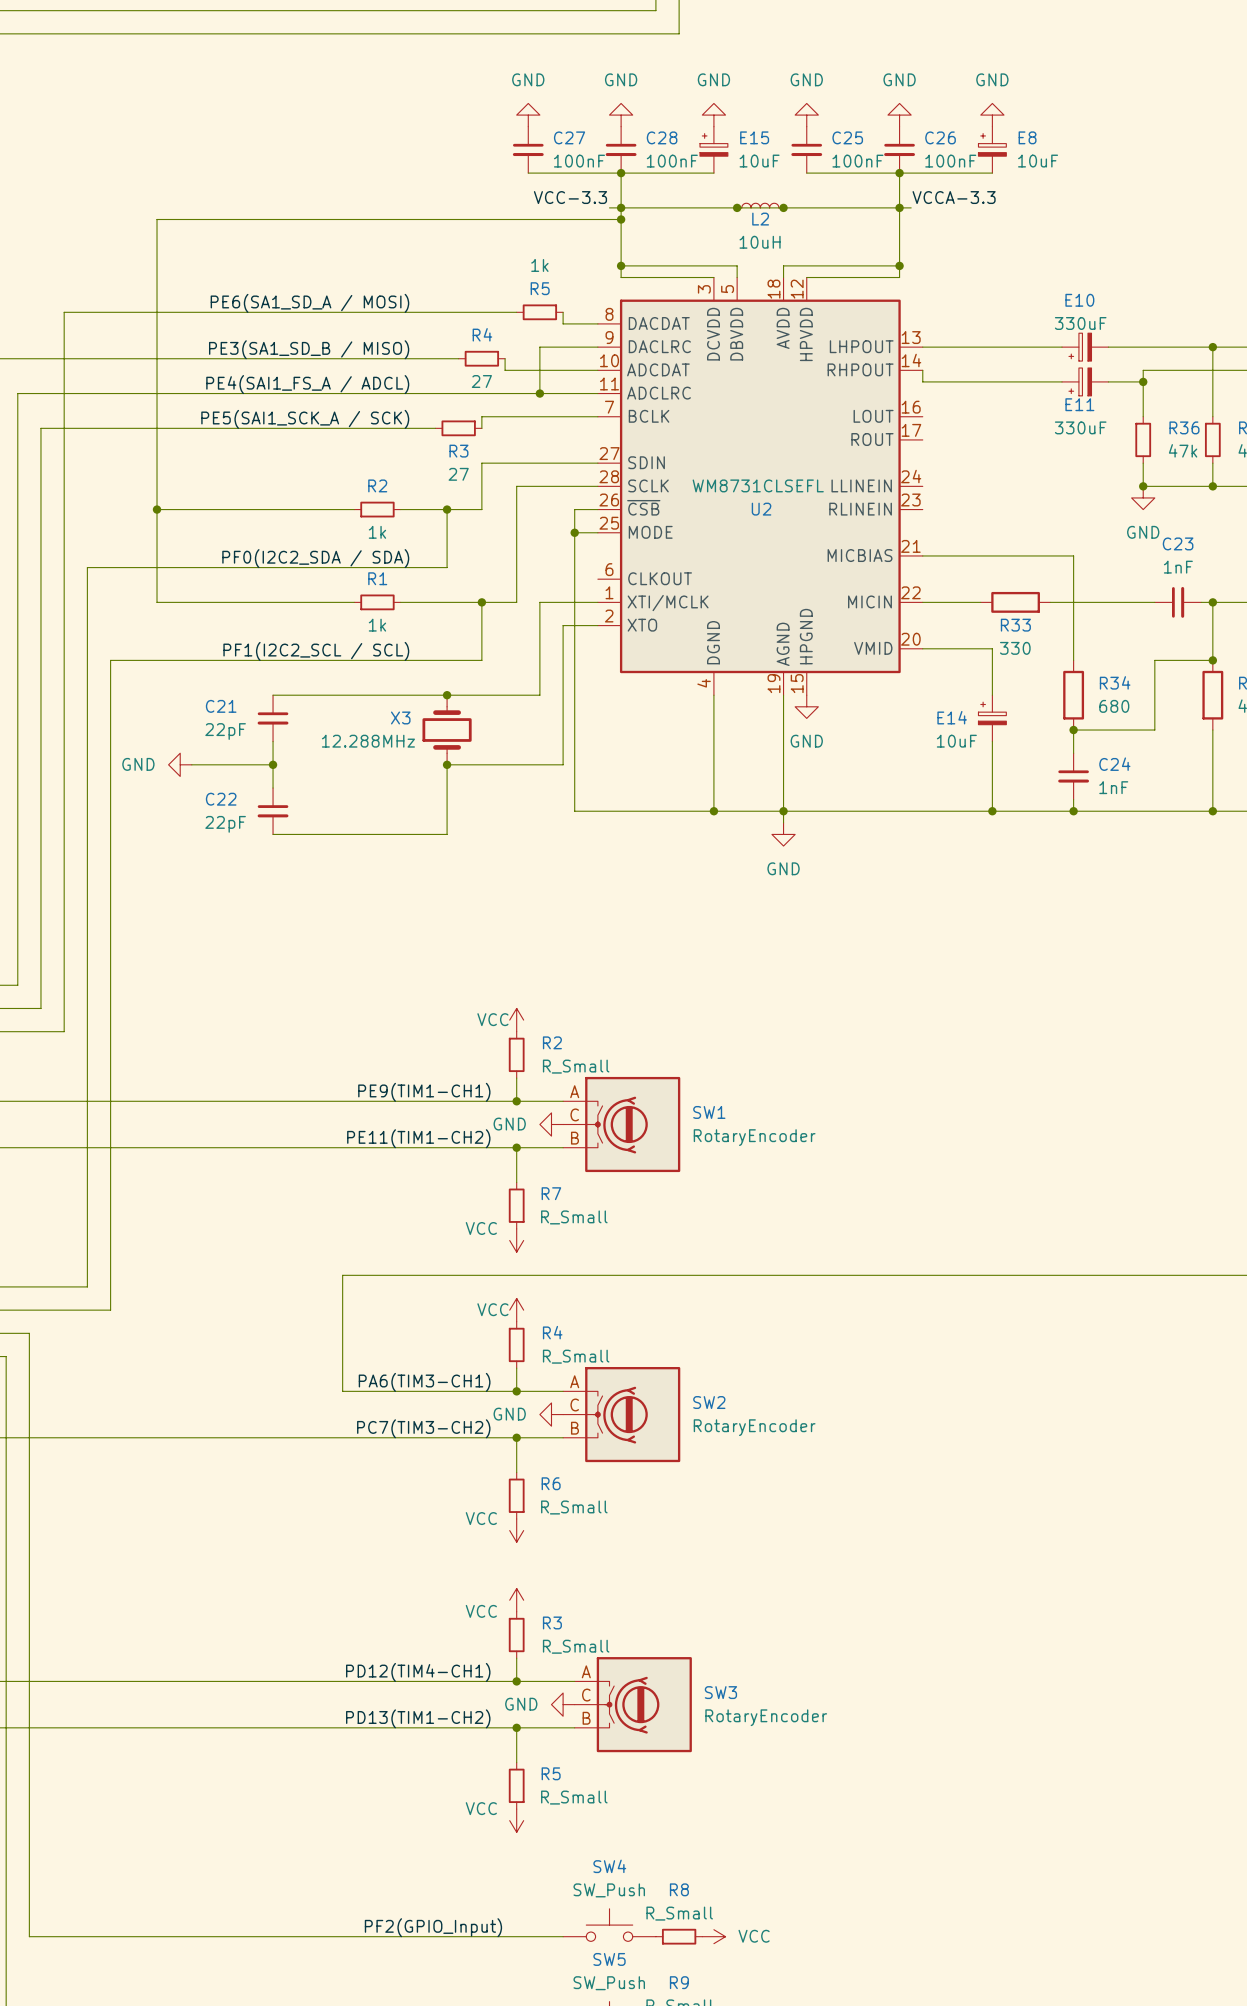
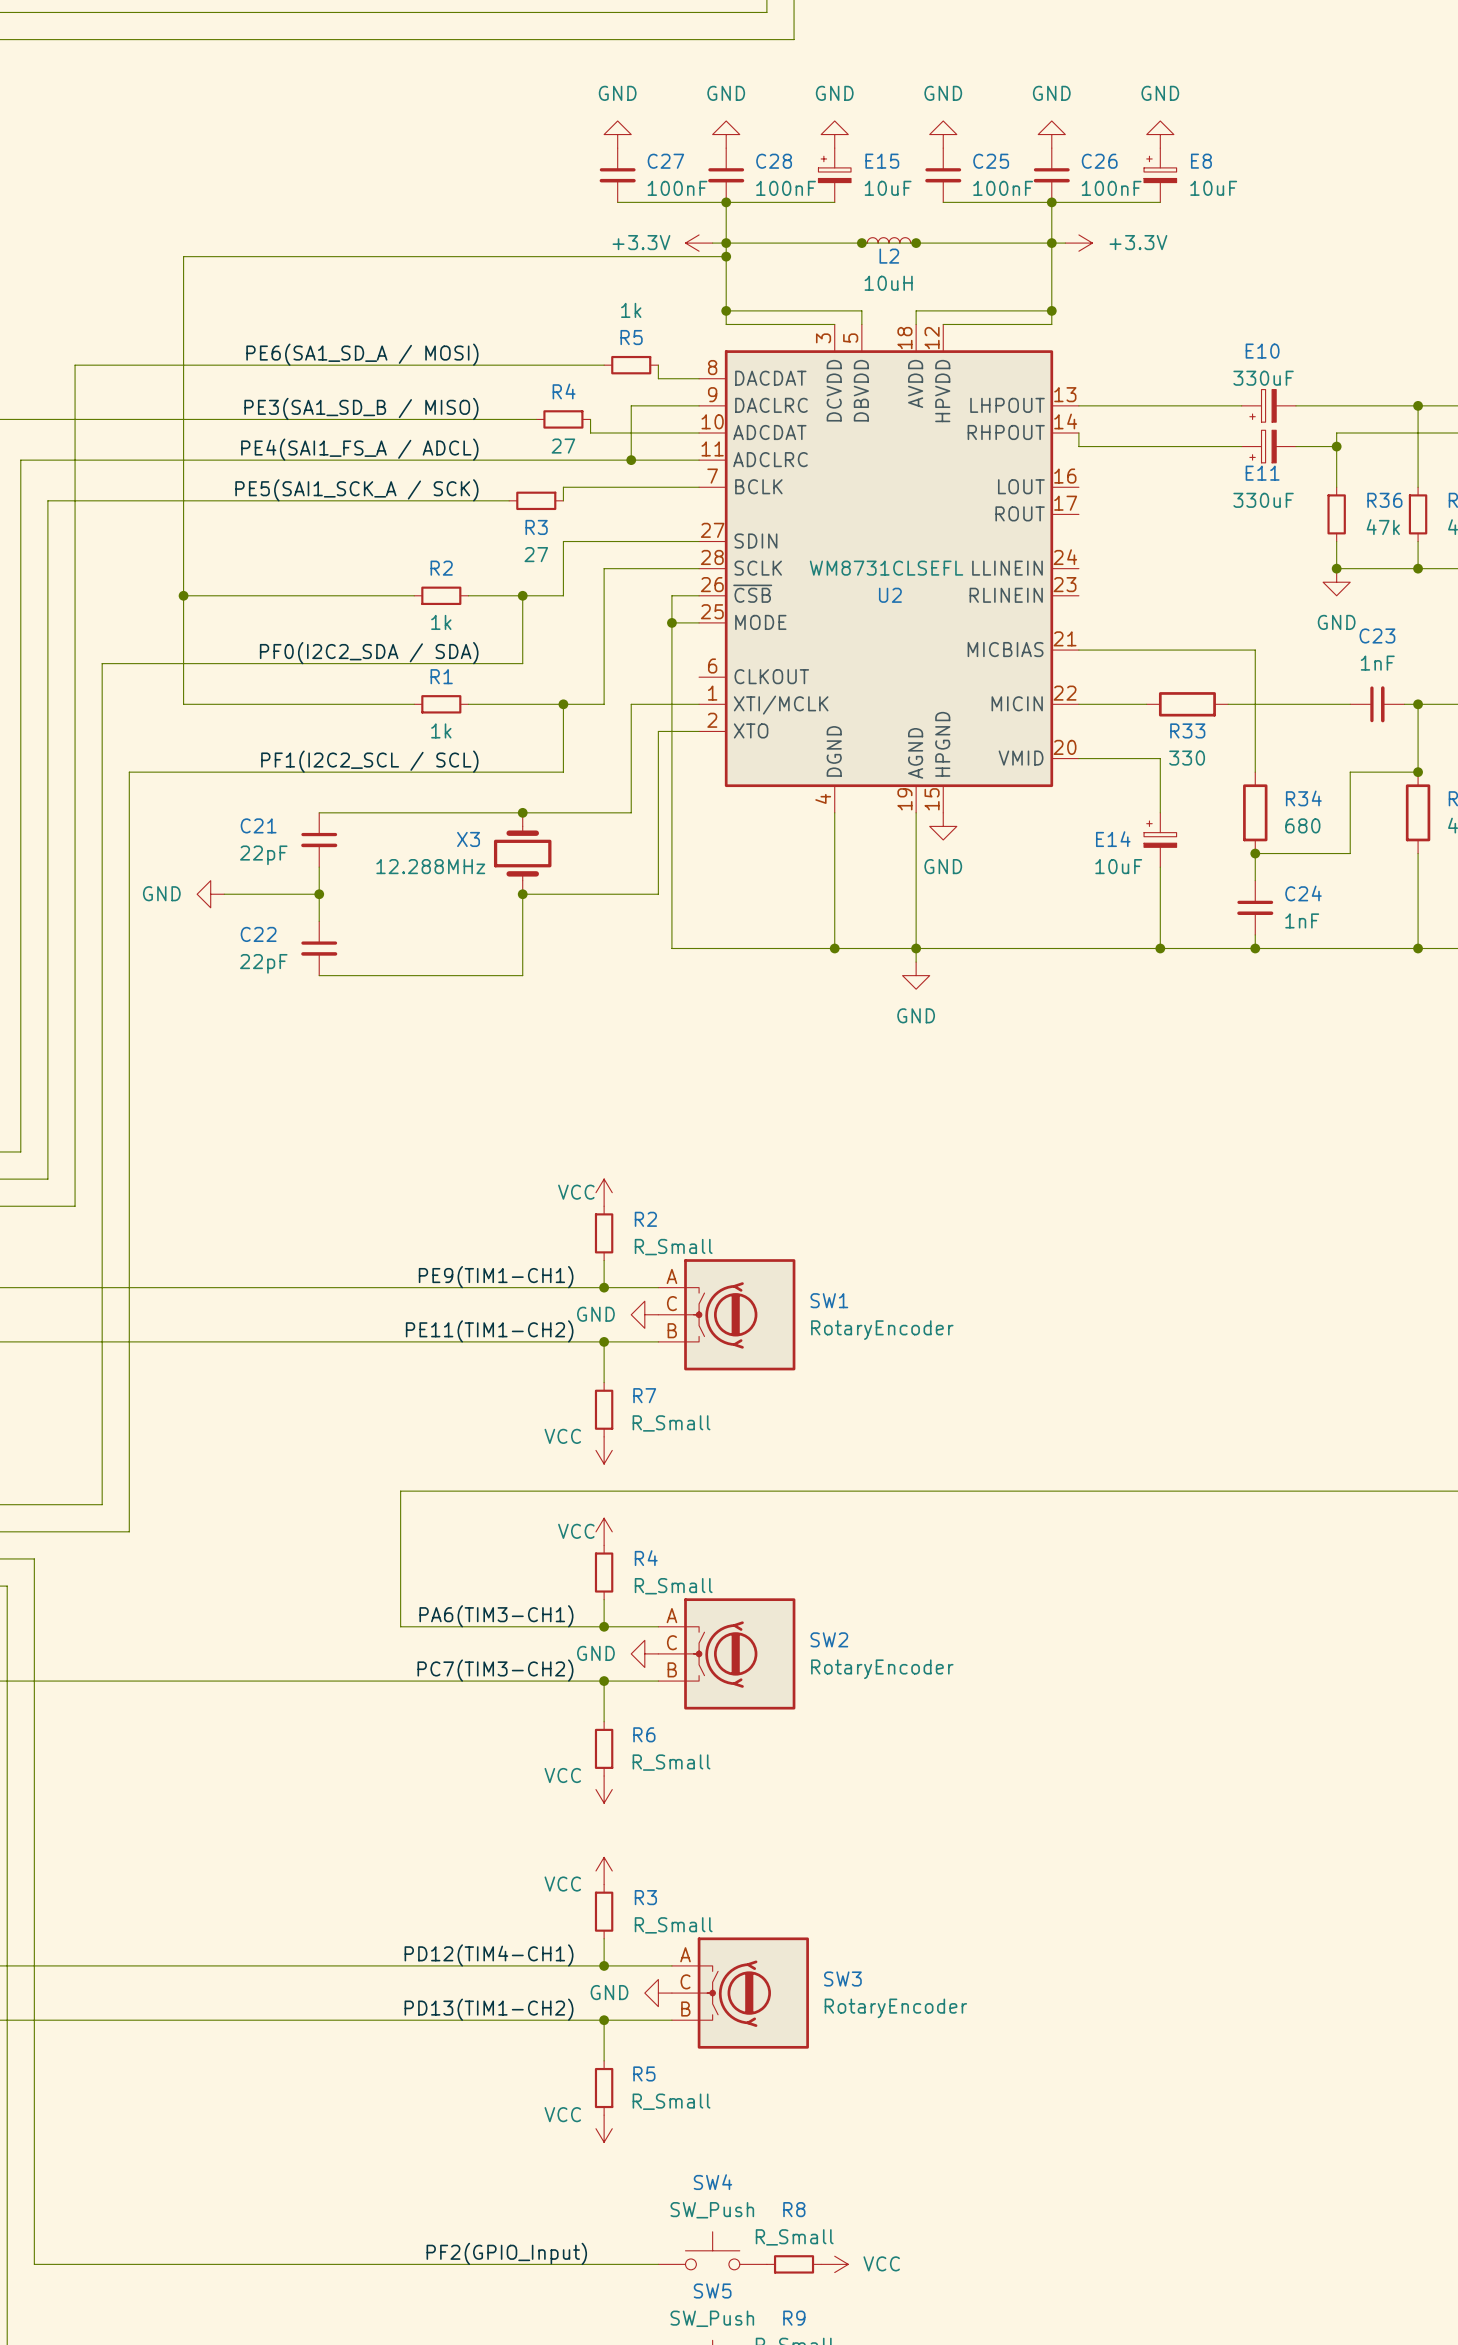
label: VCC-3.3 (570, 197) -> none
label: VCCA-3.3 (954, 197) -> none
power symbol: none -> +3.3V (699, 243)
power symbol: none -> +3.3V (1078, 243)

